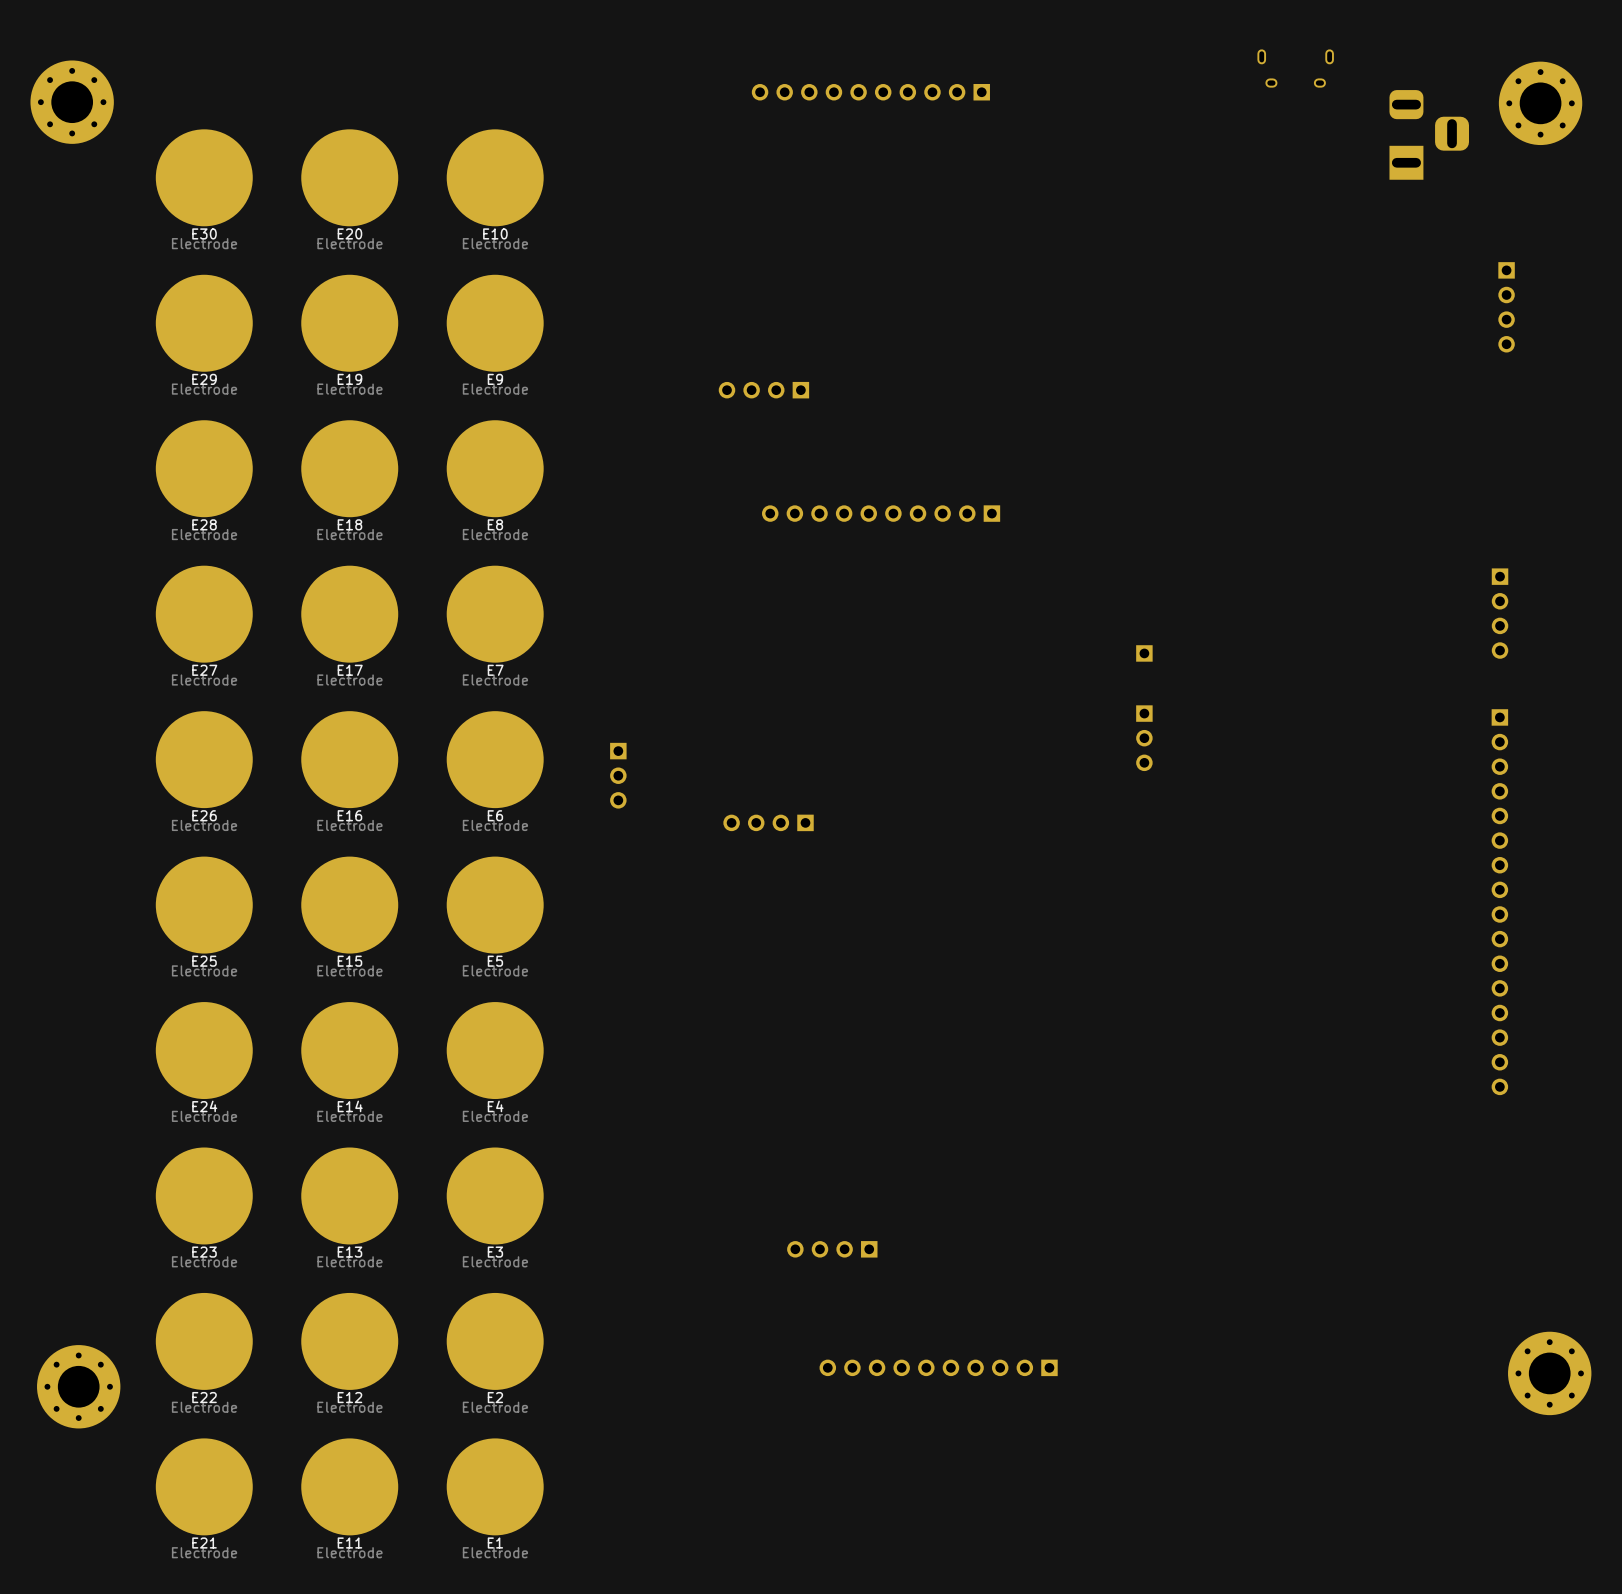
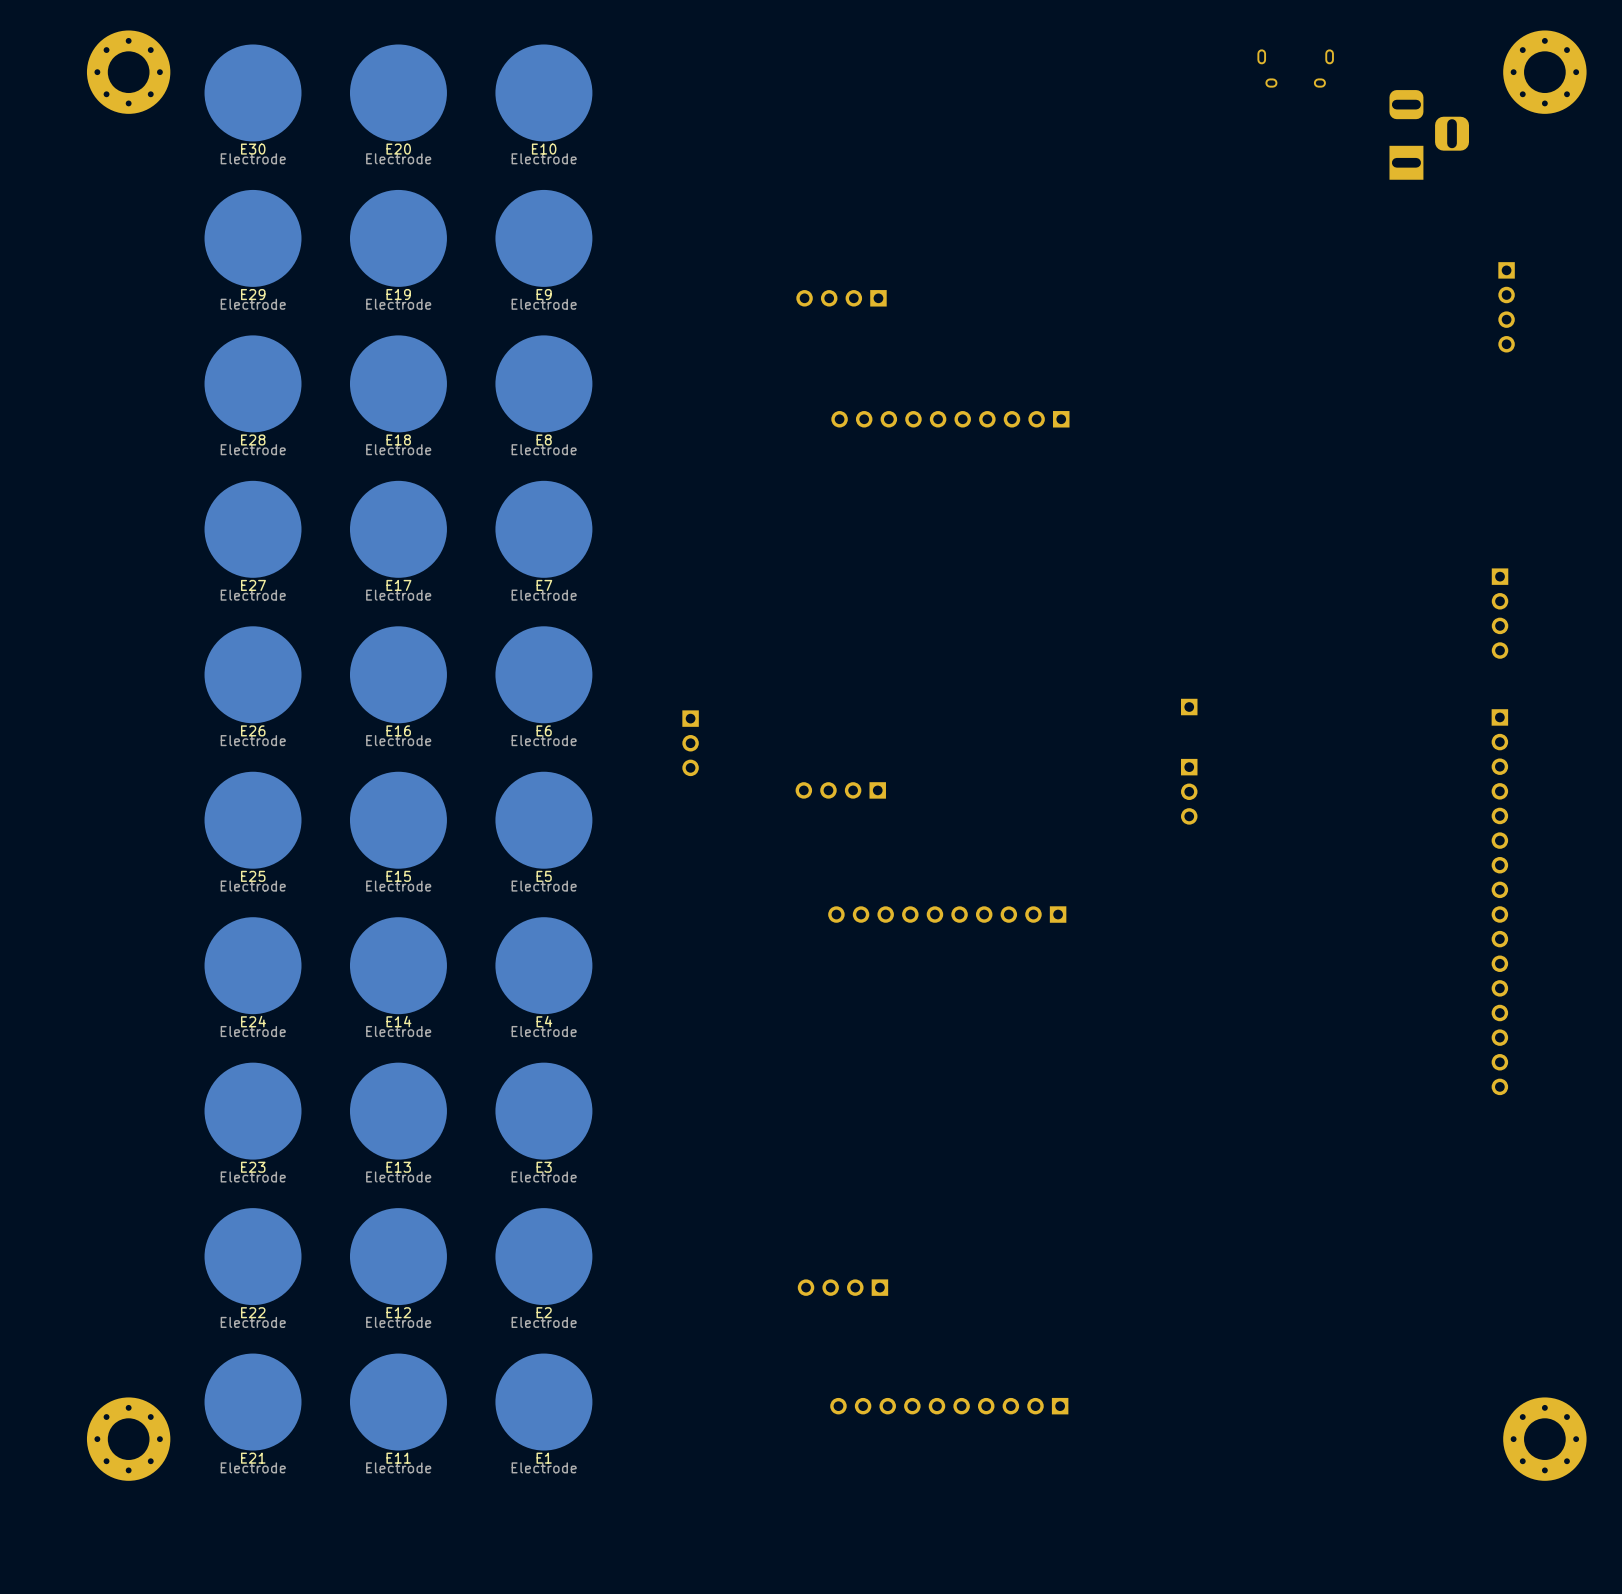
part: (870, 92) -> none
part position: (72, 102) -> (128, 72)
part position: (1540, 103) -> (1544, 72)
E30 position: (204, 177) -> (253, 92)
E20 position: (349, 177) -> (398, 92)
E10 position: (495, 177) -> (543, 92)
E29 position: (204, 323) -> (253, 238)
E19 position: (349, 323) -> (398, 238)
E9 position: (495, 323) -> (543, 238)
part position: (763, 390) -> (841, 298)
E28 position: (204, 468) -> (253, 383)
E18 position: (349, 468) -> (398, 383)
E8 position: (495, 468) -> (543, 383)
part position: (881, 513) -> (950, 419)
E27 position: (204, 614) -> (253, 529)
E17 position: (349, 614) -> (398, 529)
E7 position: (495, 614) -> (543, 529)
part position: (1144, 653) -> (1189, 707)
part position: (1144, 738) -> (1189, 791)
E26 position: (204, 759) -> (253, 674)
E16 position: (349, 759) -> (398, 674)
E6 position: (495, 759) -> (543, 674)
part position: (618, 775) -> (690, 743)
part position: (768, 822) -> (840, 790)
E25 position: (204, 905) -> (253, 820)
E15 position: (349, 905) -> (398, 820)
E5 position: (495, 905) -> (543, 820)
part: none -> (947, 914)
E24 position: (204, 1050) -> (253, 965)
E14 position: (349, 1050) -> (398, 965)
E4 position: (495, 1050) -> (543, 965)
E23 position: (204, 1195) -> (253, 1111)
E13 position: (349, 1195) -> (398, 1111)
E3 position: (495, 1195) -> (543, 1111)
part position: (832, 1249) -> (842, 1287)
E22 position: (204, 1341) -> (253, 1256)
E12 position: (349, 1341) -> (398, 1256)
E2 position: (495, 1341) -> (543, 1256)
part position: (938, 1367) -> (949, 1406)
part position: (1549, 1373) -> (1544, 1439)
part position: (78, 1386) -> (128, 1439)
E21 position: (204, 1486) -> (253, 1402)
E11 position: (349, 1486) -> (398, 1402)
E1 position: (495, 1486) -> (543, 1402)

